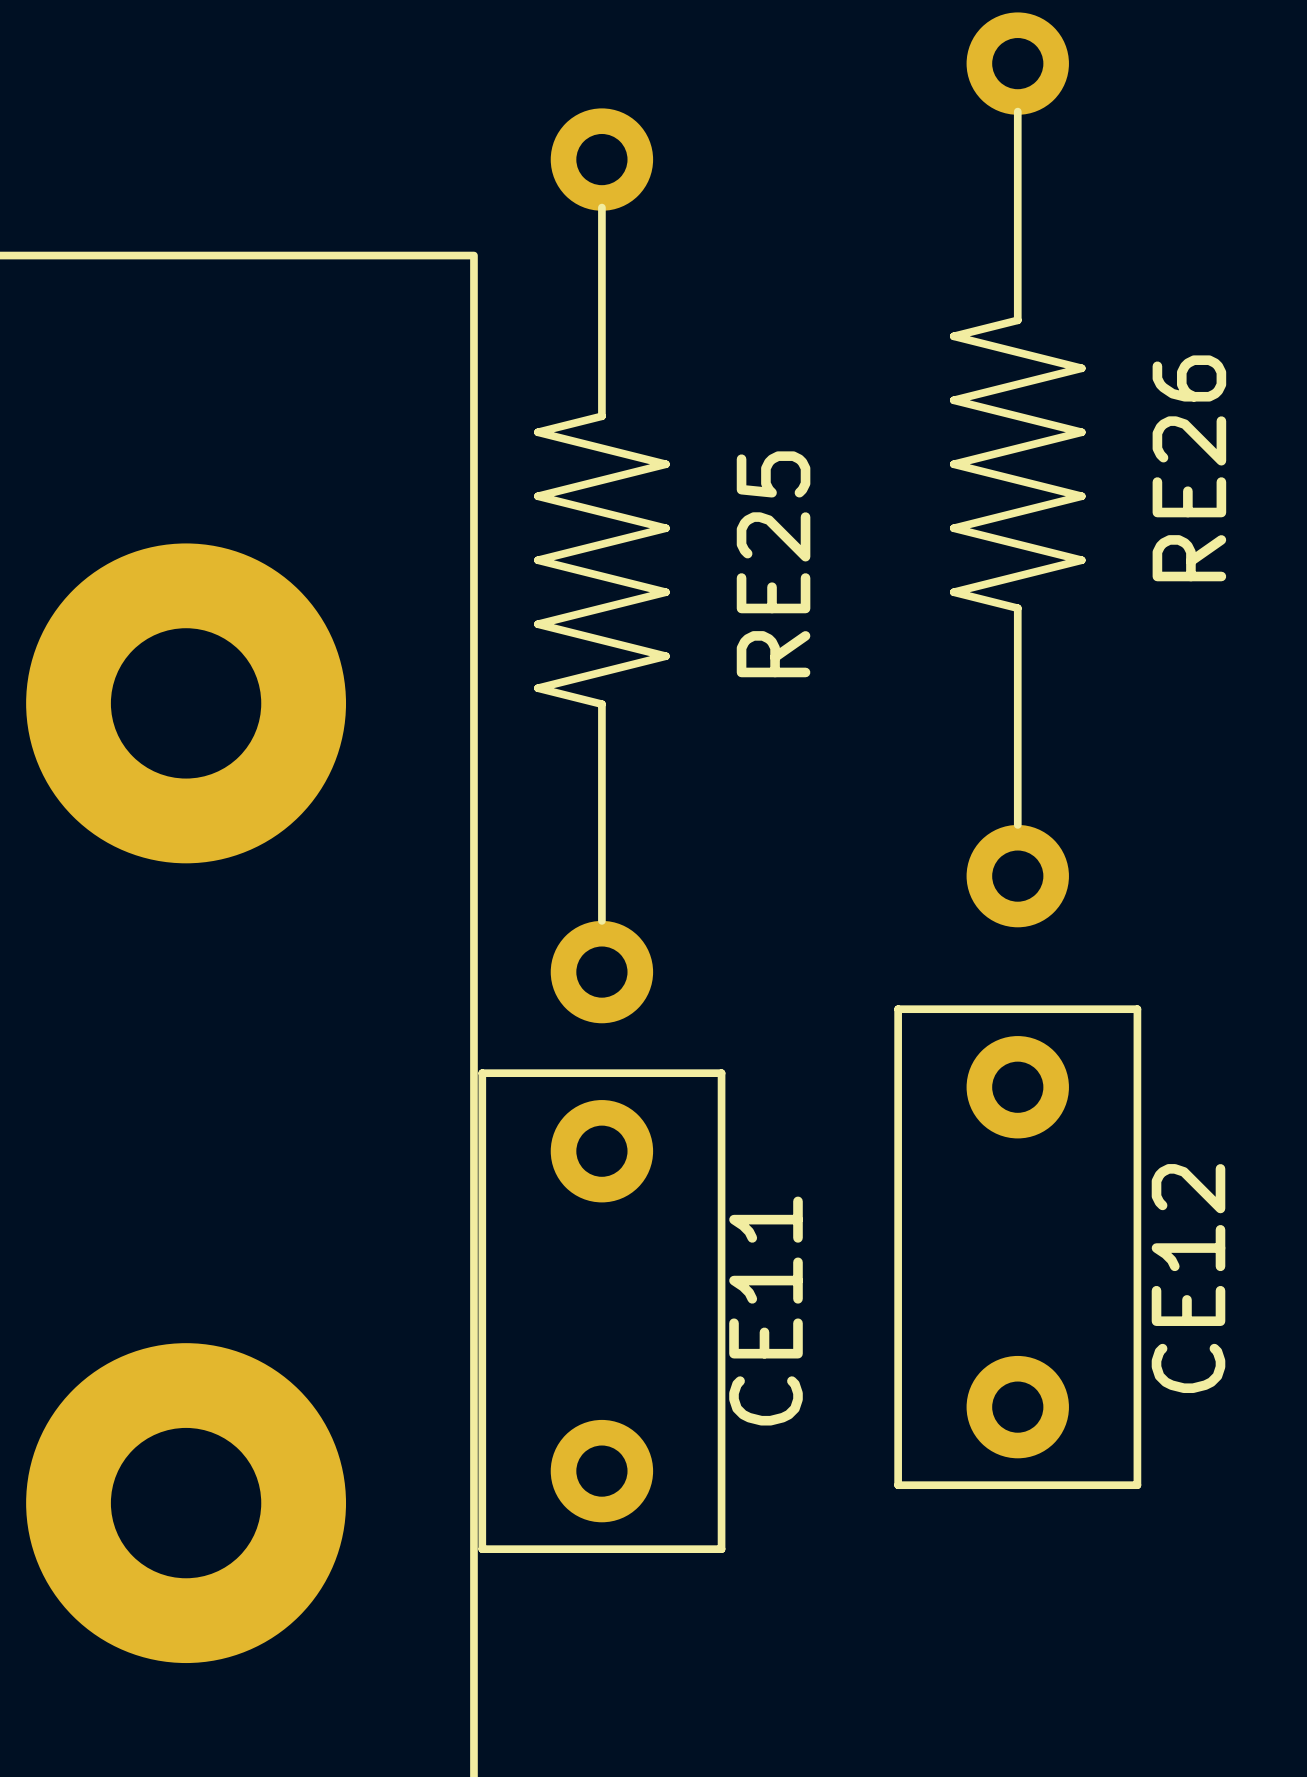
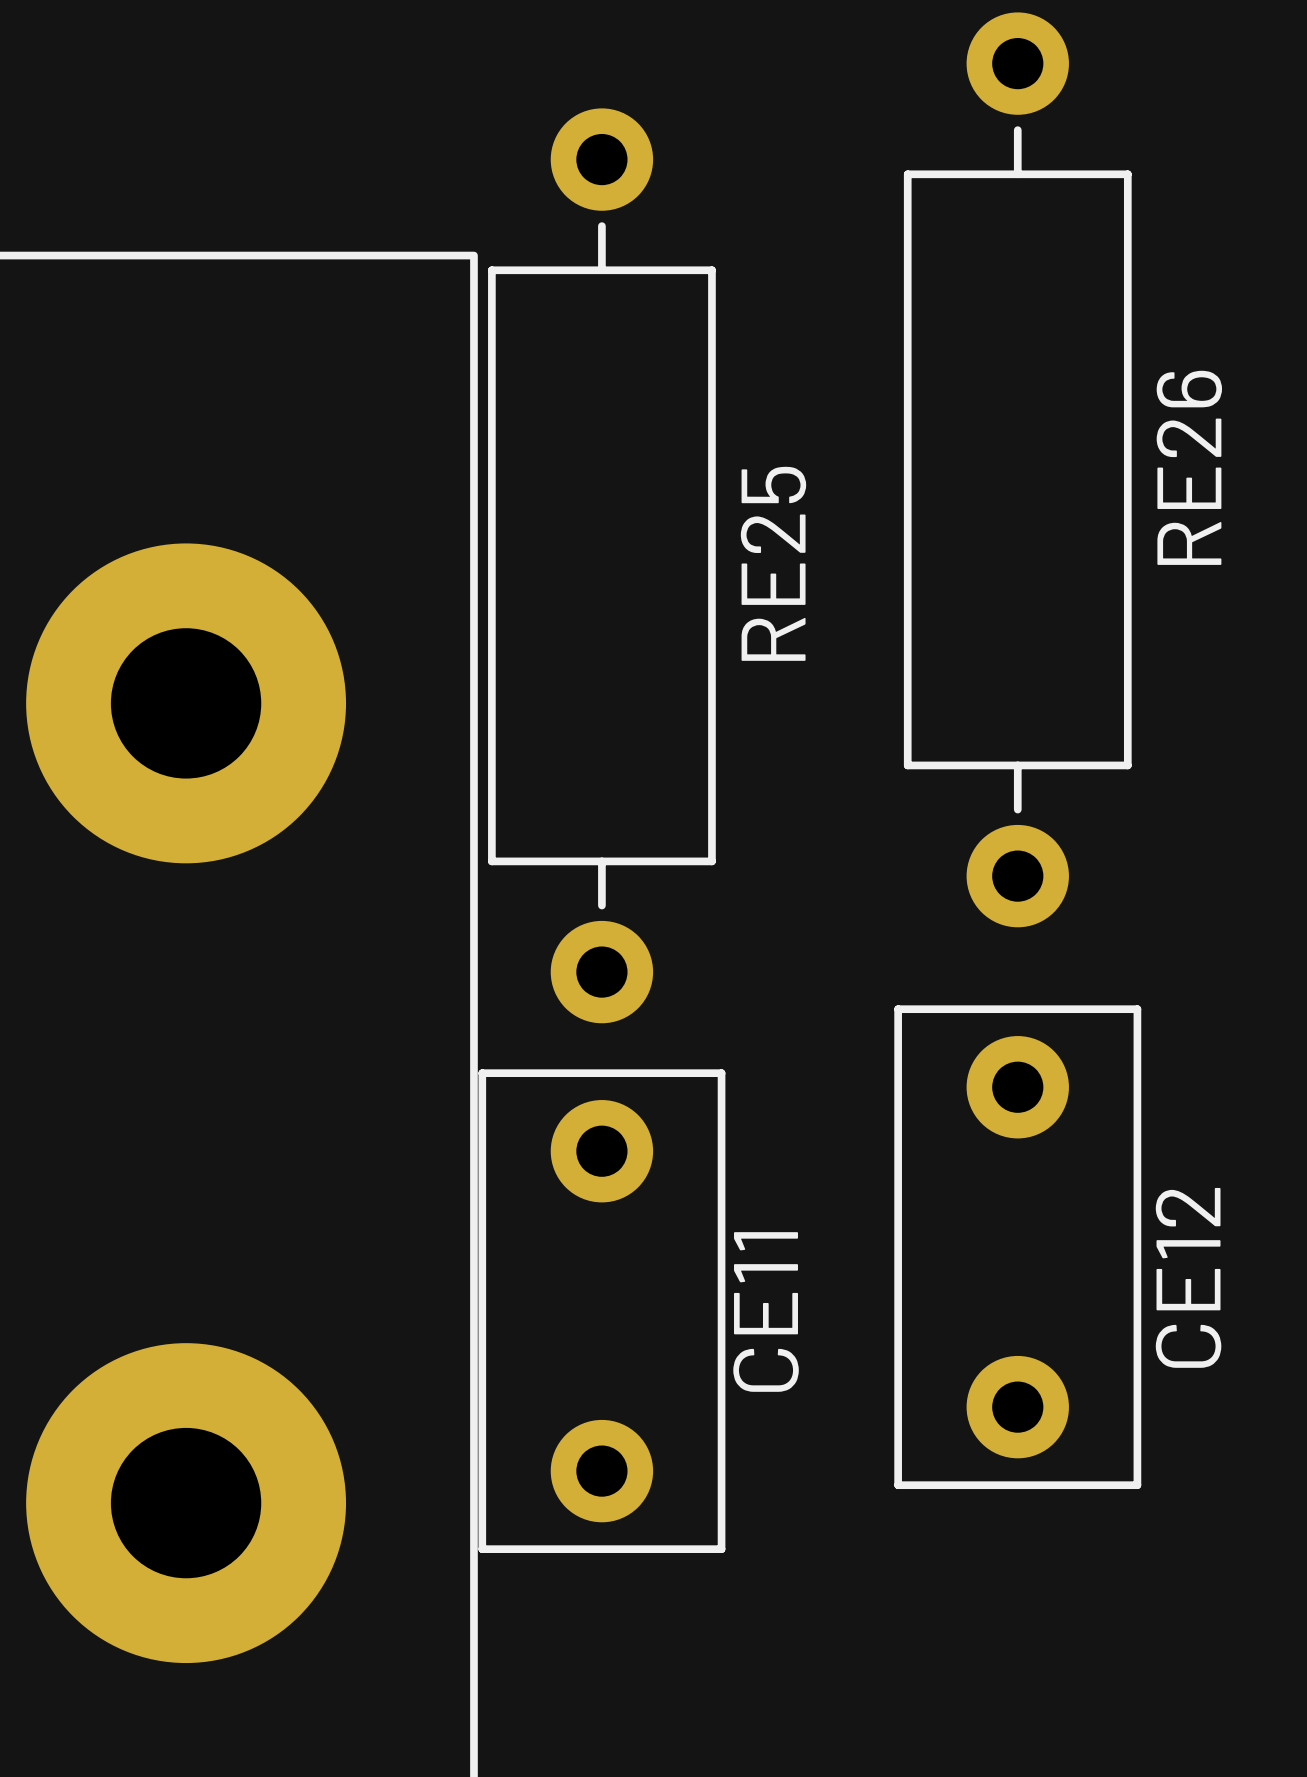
RE26 footprint: [949, 12, 1086, 928] -> [903, 12, 1132, 928]
RE25 footprint: [534, 108, 670, 1024] -> [488, 108, 716, 1024]

